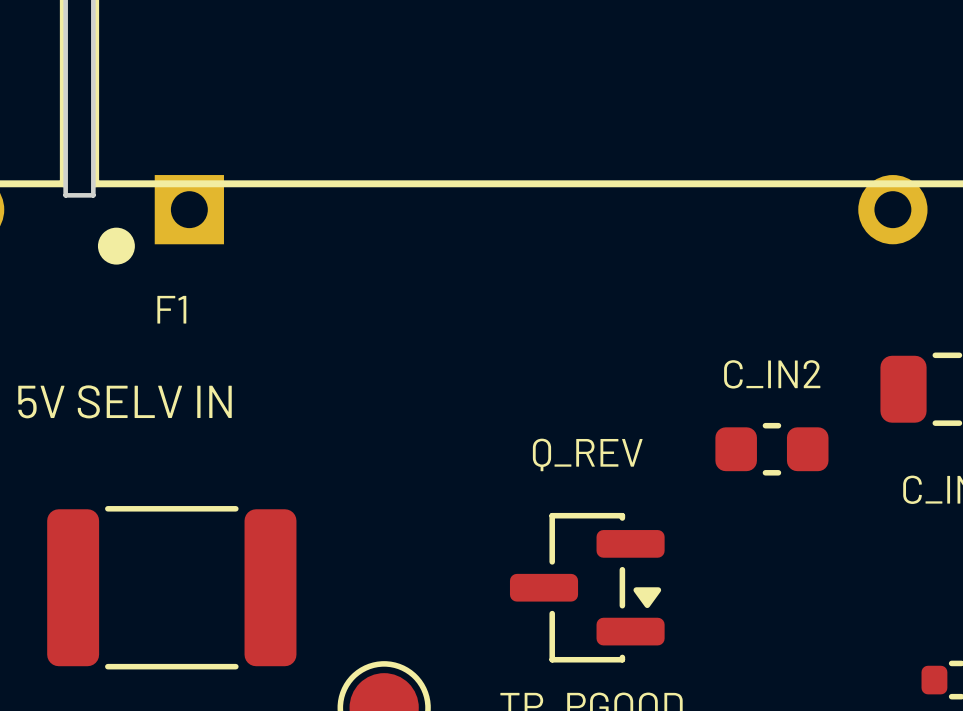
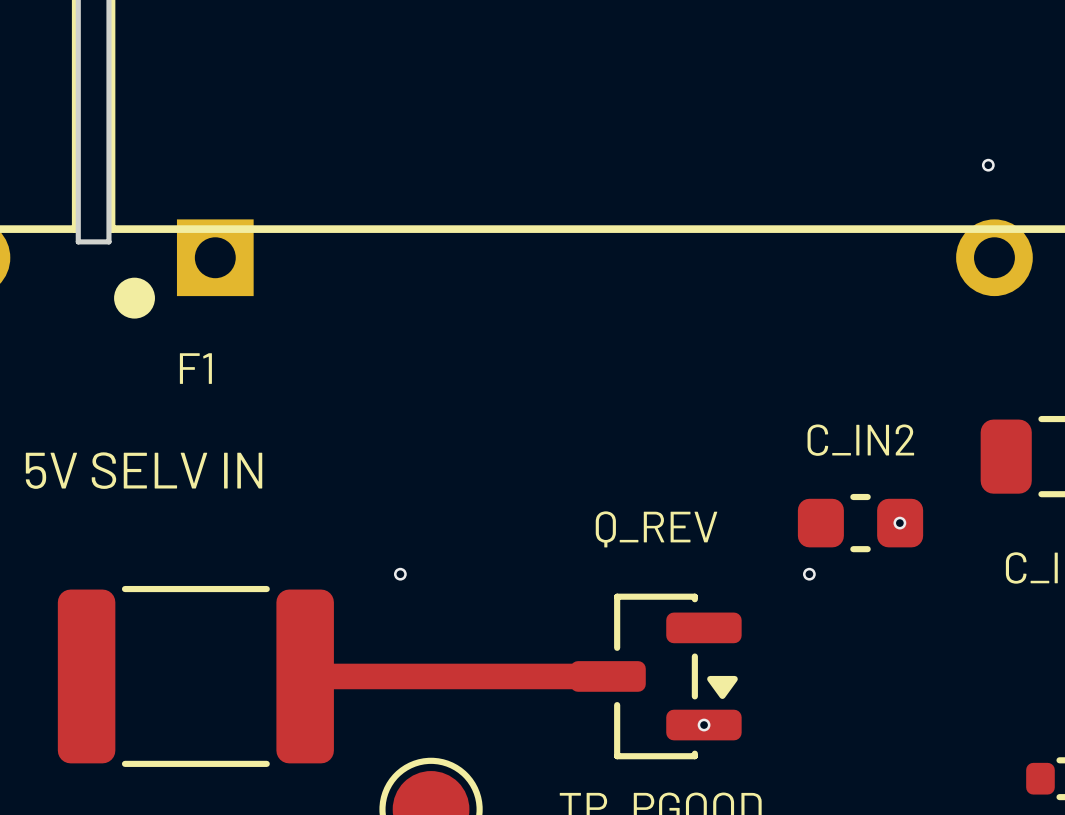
via: none -> (988, 165)
via: none -> (899, 523)
via: none -> (400, 574)
via: none -> (809, 574)
top track: none -> (303, 676) (609, 676)
via: none -> (704, 725)

